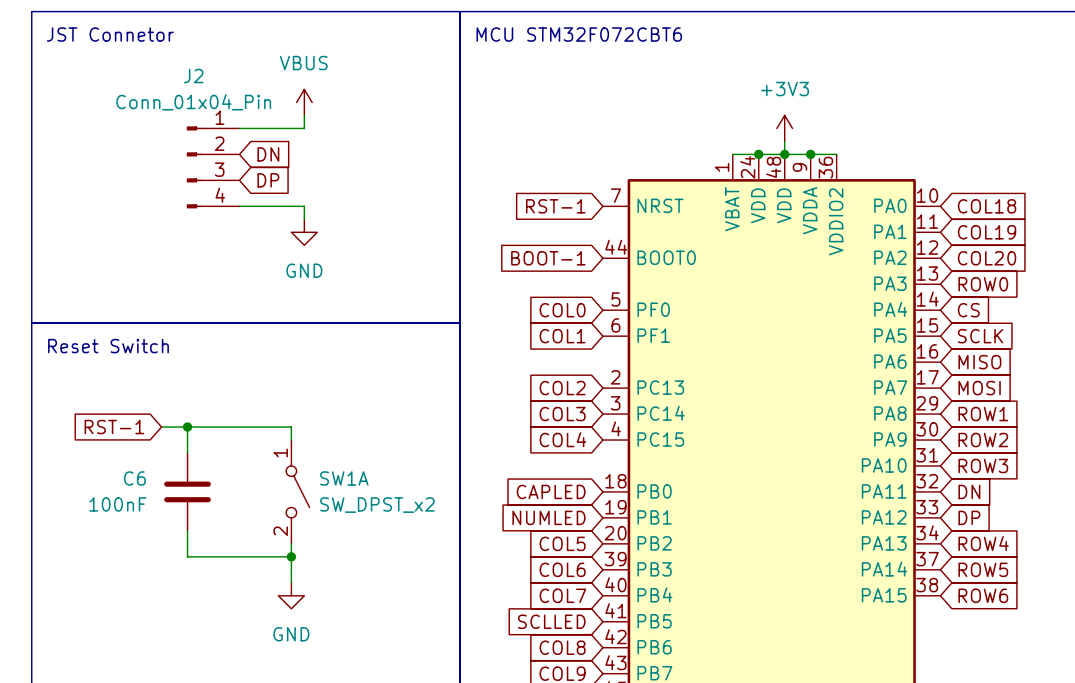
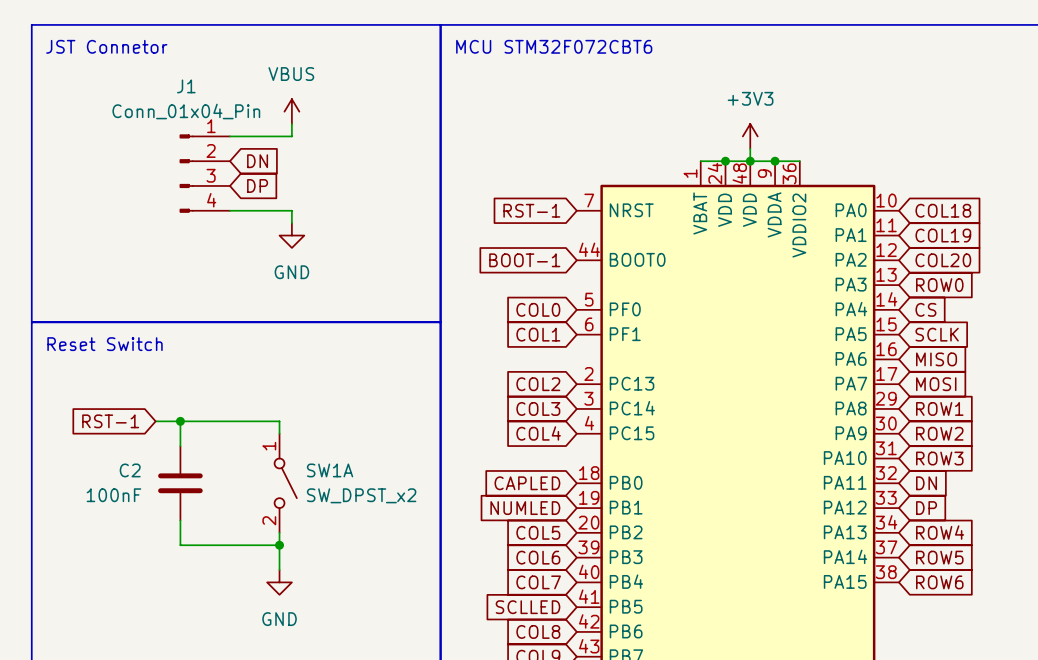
J2 name: J2 (193, 76) -> J1 (186, 86)
C6 name: C6 (134, 478) -> C2 (130, 470)

